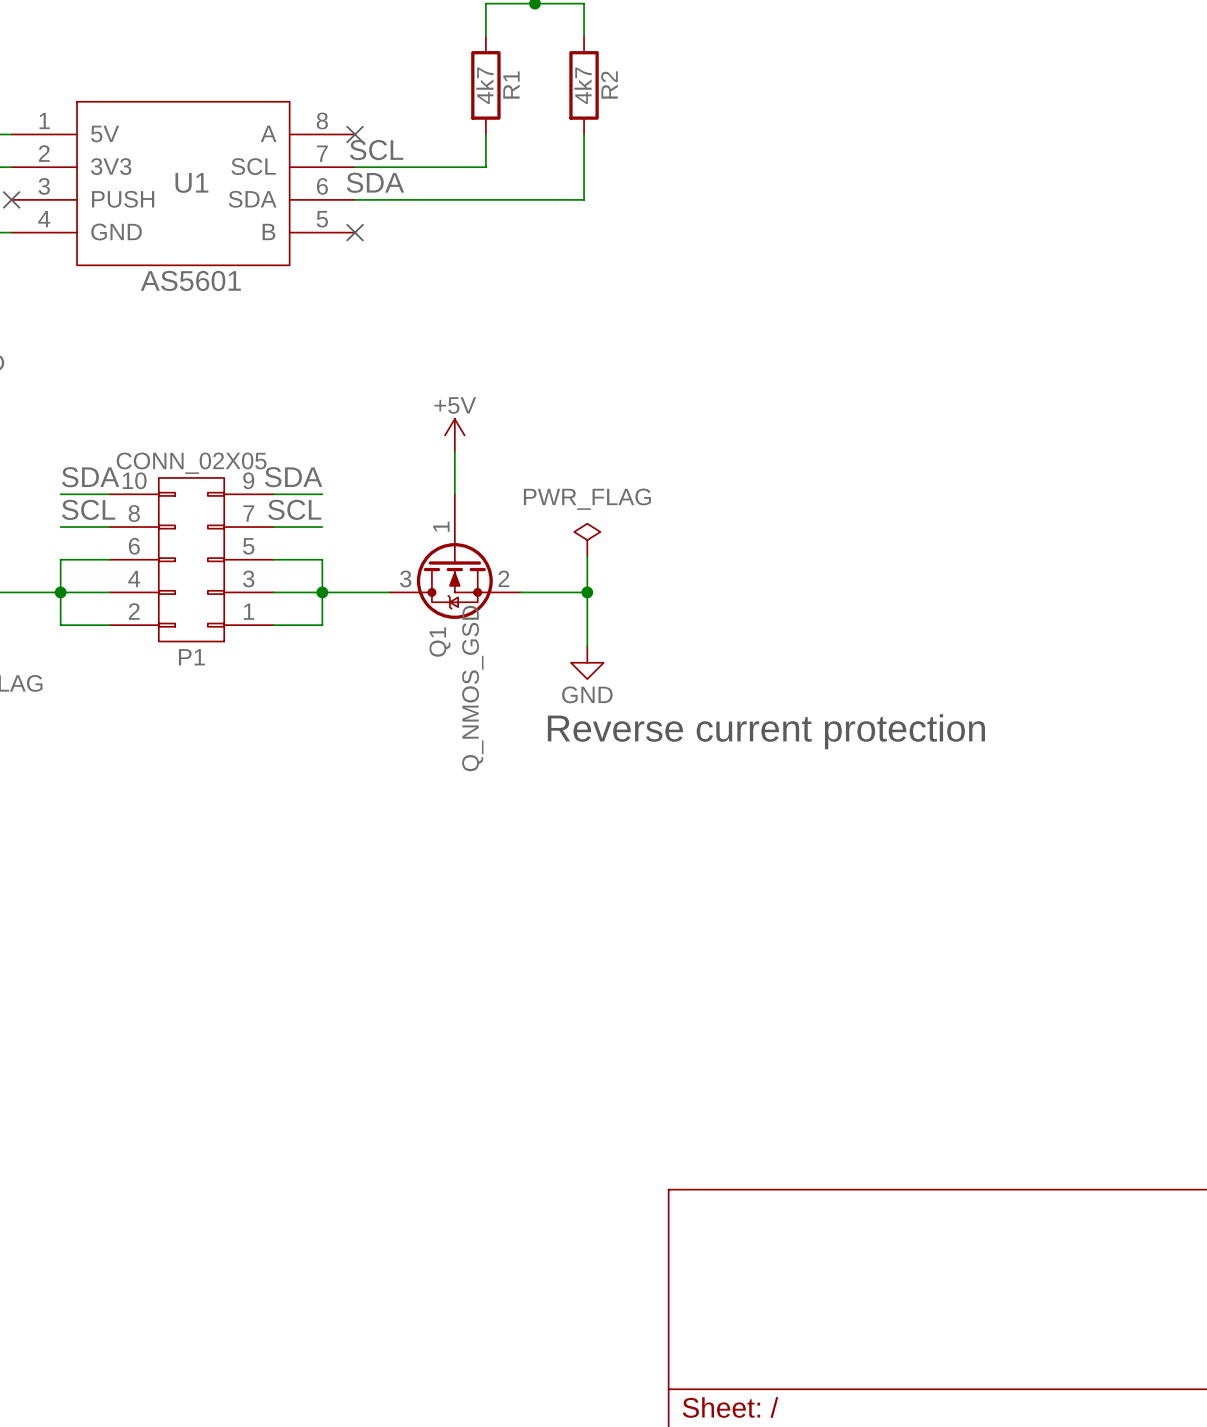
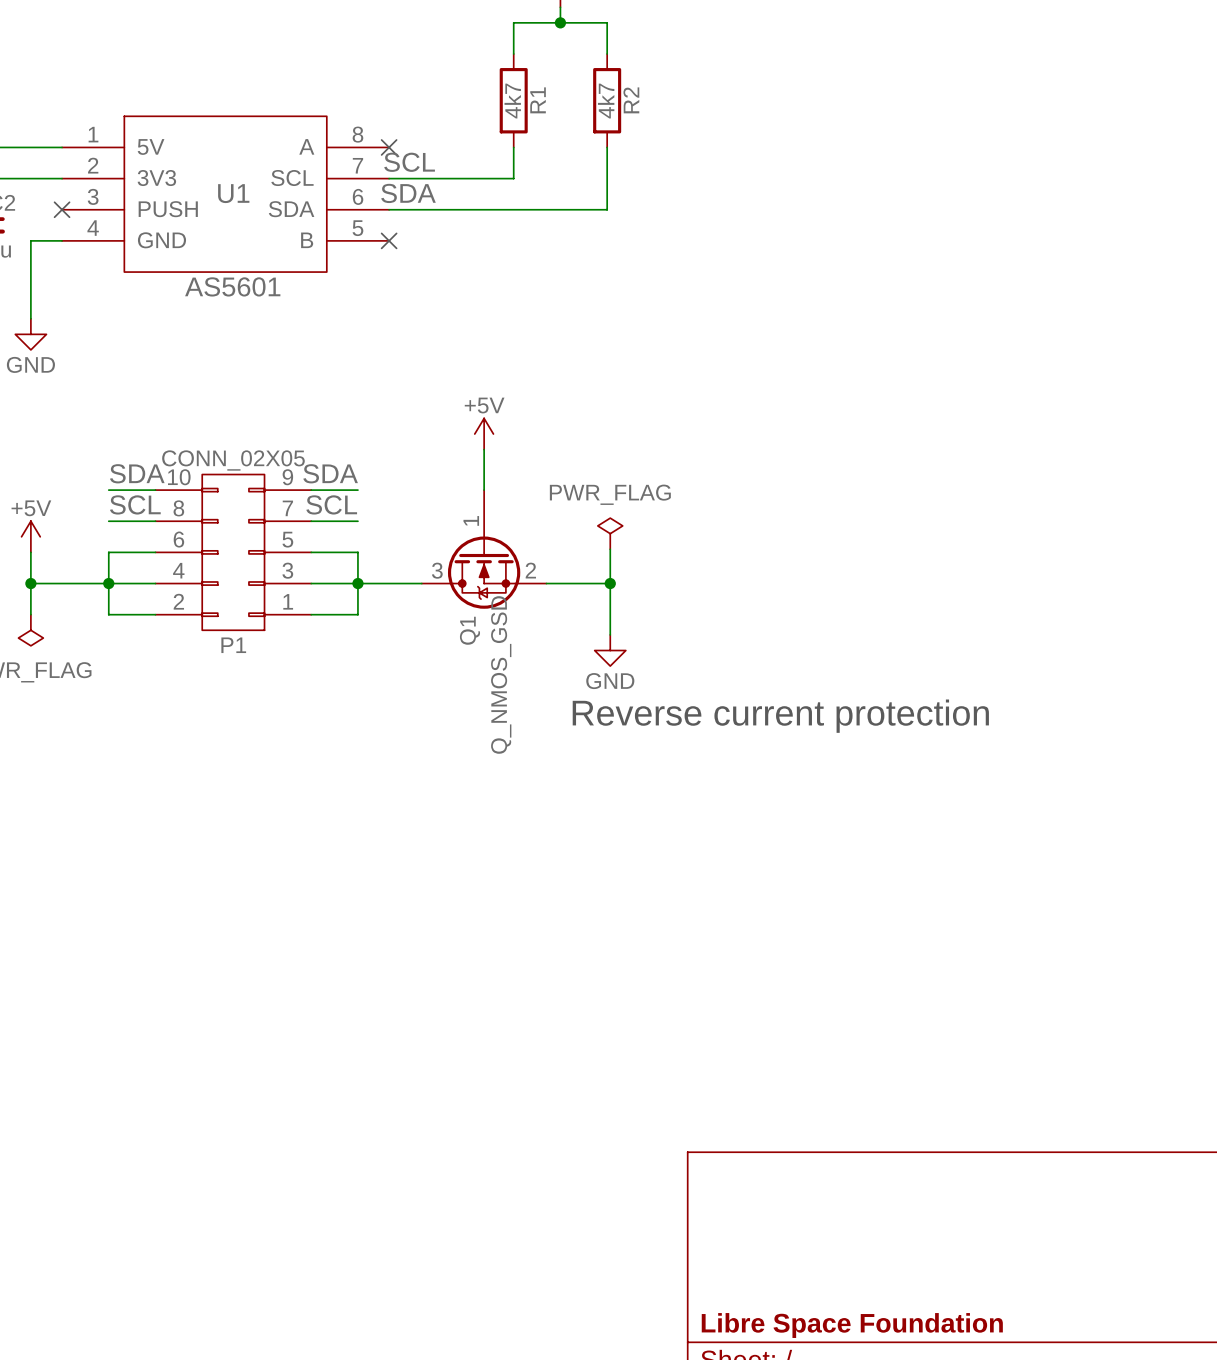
title block: none -> Libre Space Foundation (852, 1325)

